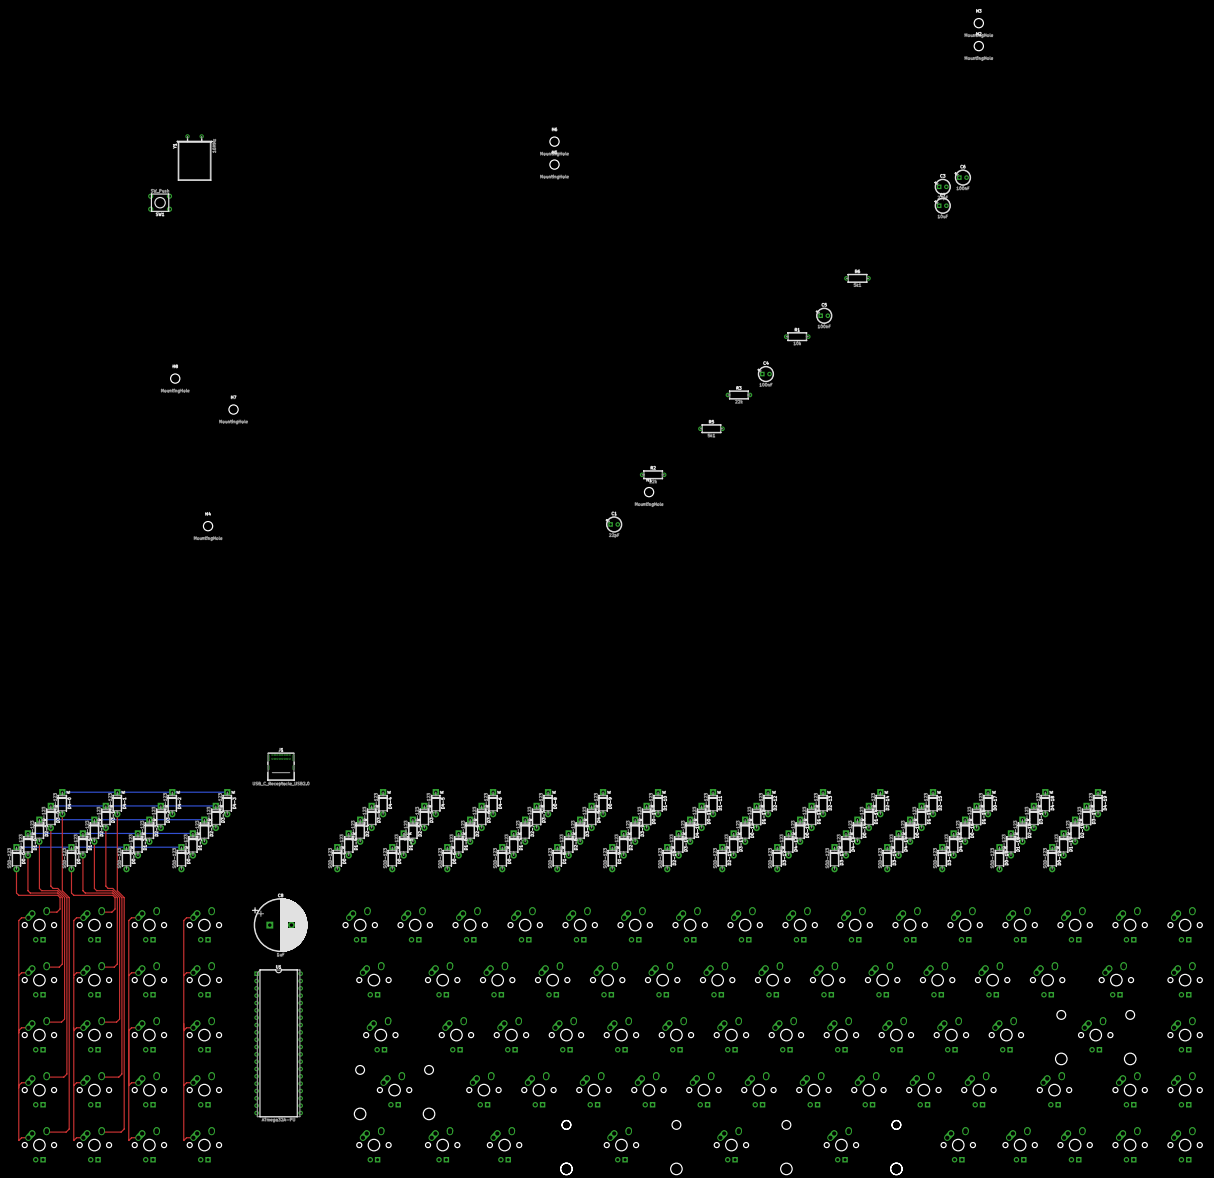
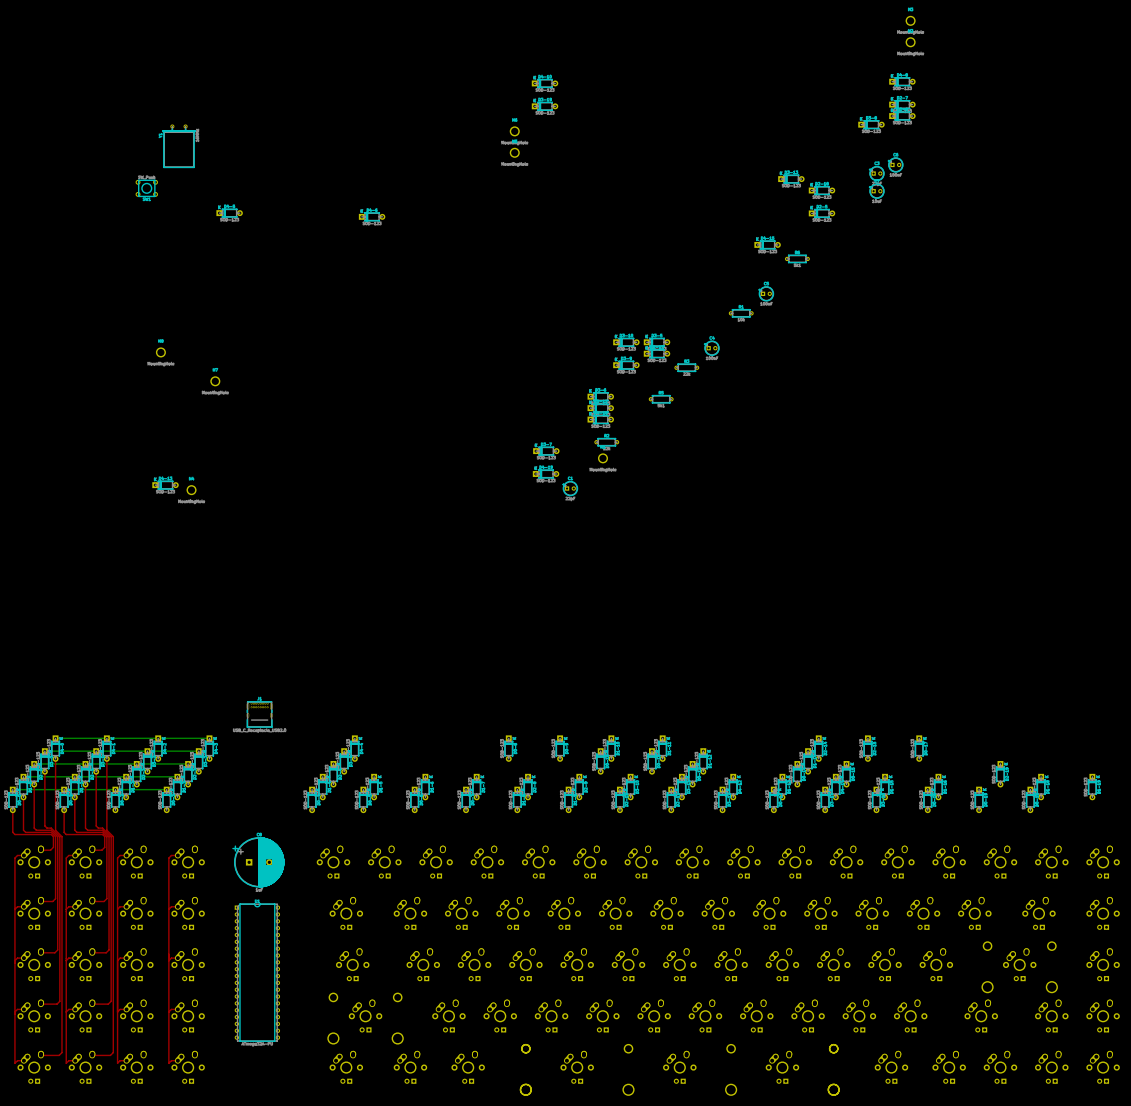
part rotation: 0° (435, 803) -> 90° counterclockwise (229, 213)
part position: (435, 803) -> (229, 213)
part rotation: 0° (493, 803) -> 90° counterclockwise (372, 216)
part position: (493, 803) -> (372, 216)
part rotation: 0° (768, 803) -> 90° counterclockwise (600, 408)
part position: (768, 803) -> (600, 408)
part rotation: 0° (823, 803) -> 90° counterclockwise (657, 353)
part position: (823, 803) -> (657, 353)
part rotation: 0° (1045, 803) -> 90° counterclockwise (600, 419)
part position: (1045, 803) -> (600, 419)
part rotation: 0° (1098, 803) -> 90° counterclockwise (546, 473)
part position: (1098, 803) -> (546, 473)
part rotation: 0° (424, 816) -> 90° counterclockwise (657, 342)
part position: (424, 816) -> (657, 342)
part rotation: 0° (481, 816) -> 90° counterclockwise (600, 396)
part position: (481, 816) -> (600, 396)
part rotation: 0° (536, 816) -> 90° counterclockwise (546, 451)
part position: (536, 816) -> (546, 451)
part rotation: 0° (591, 816) -> 90° counterclockwise (902, 81)
part position: (591, 816) -> (902, 81)
part position: (811, 816) -> (782, 787)
part position: (921, 816) -> (885, 787)
part position: (976, 816) -> (938, 787)
part rotation: 0° (1033, 816) -> 90° counterclockwise (626, 342)
part position: (1033, 816) -> (626, 342)
part rotation: 0° (1086, 816) -> 90° counterclockwise (545, 106)
part position: (1086, 816) -> (545, 106)
part rotation: 0° (412, 830) -> 90° counterclockwise (822, 213)
part position: (412, 830) -> (822, 213)
part rotation: 0° (470, 830) -> 90° counterclockwise (902, 116)
part position: (470, 830) -> (902, 116)
part rotation: 0° (525, 830) -> 90° counterclockwise (902, 104)
part position: (525, 830) -> (902, 104)
part rotation: 0° (580, 830) -> 90° counterclockwise (871, 124)
part position: (580, 830) -> (871, 124)
part rotation: 0° (635, 830) -> 90° counterclockwise (626, 365)
part position: (635, 830) -> (626, 365)
part rotation: 0° (690, 830) -> 90° counterclockwise (545, 83)
part position: (690, 830) -> (545, 83)
part position: (800, 830) -> (773, 799)
part position: (965, 830) -> (927, 799)
part rotation: 0° (1022, 830) -> 90° counterclockwise (822, 190)
part position: (1022, 830) -> (822, 190)
part rotation: 0° (845, 844) -> 90° counterclockwise (165, 485)
part position: (845, 844) -> (165, 485)
part rotation: 0° (953, 844) -> 90° counterclockwise (767, 244)
part position: (953, 844) -> (767, 244)
part position: (1010, 844) -> (1041, 787)
part position: (1063, 844) -> (1092, 787)
part rotation: 0° (834, 858) -> 90° counterclockwise (791, 179)
part position: (834, 858) -> (791, 179)
part position: (999, 858) -> (1030, 799)

